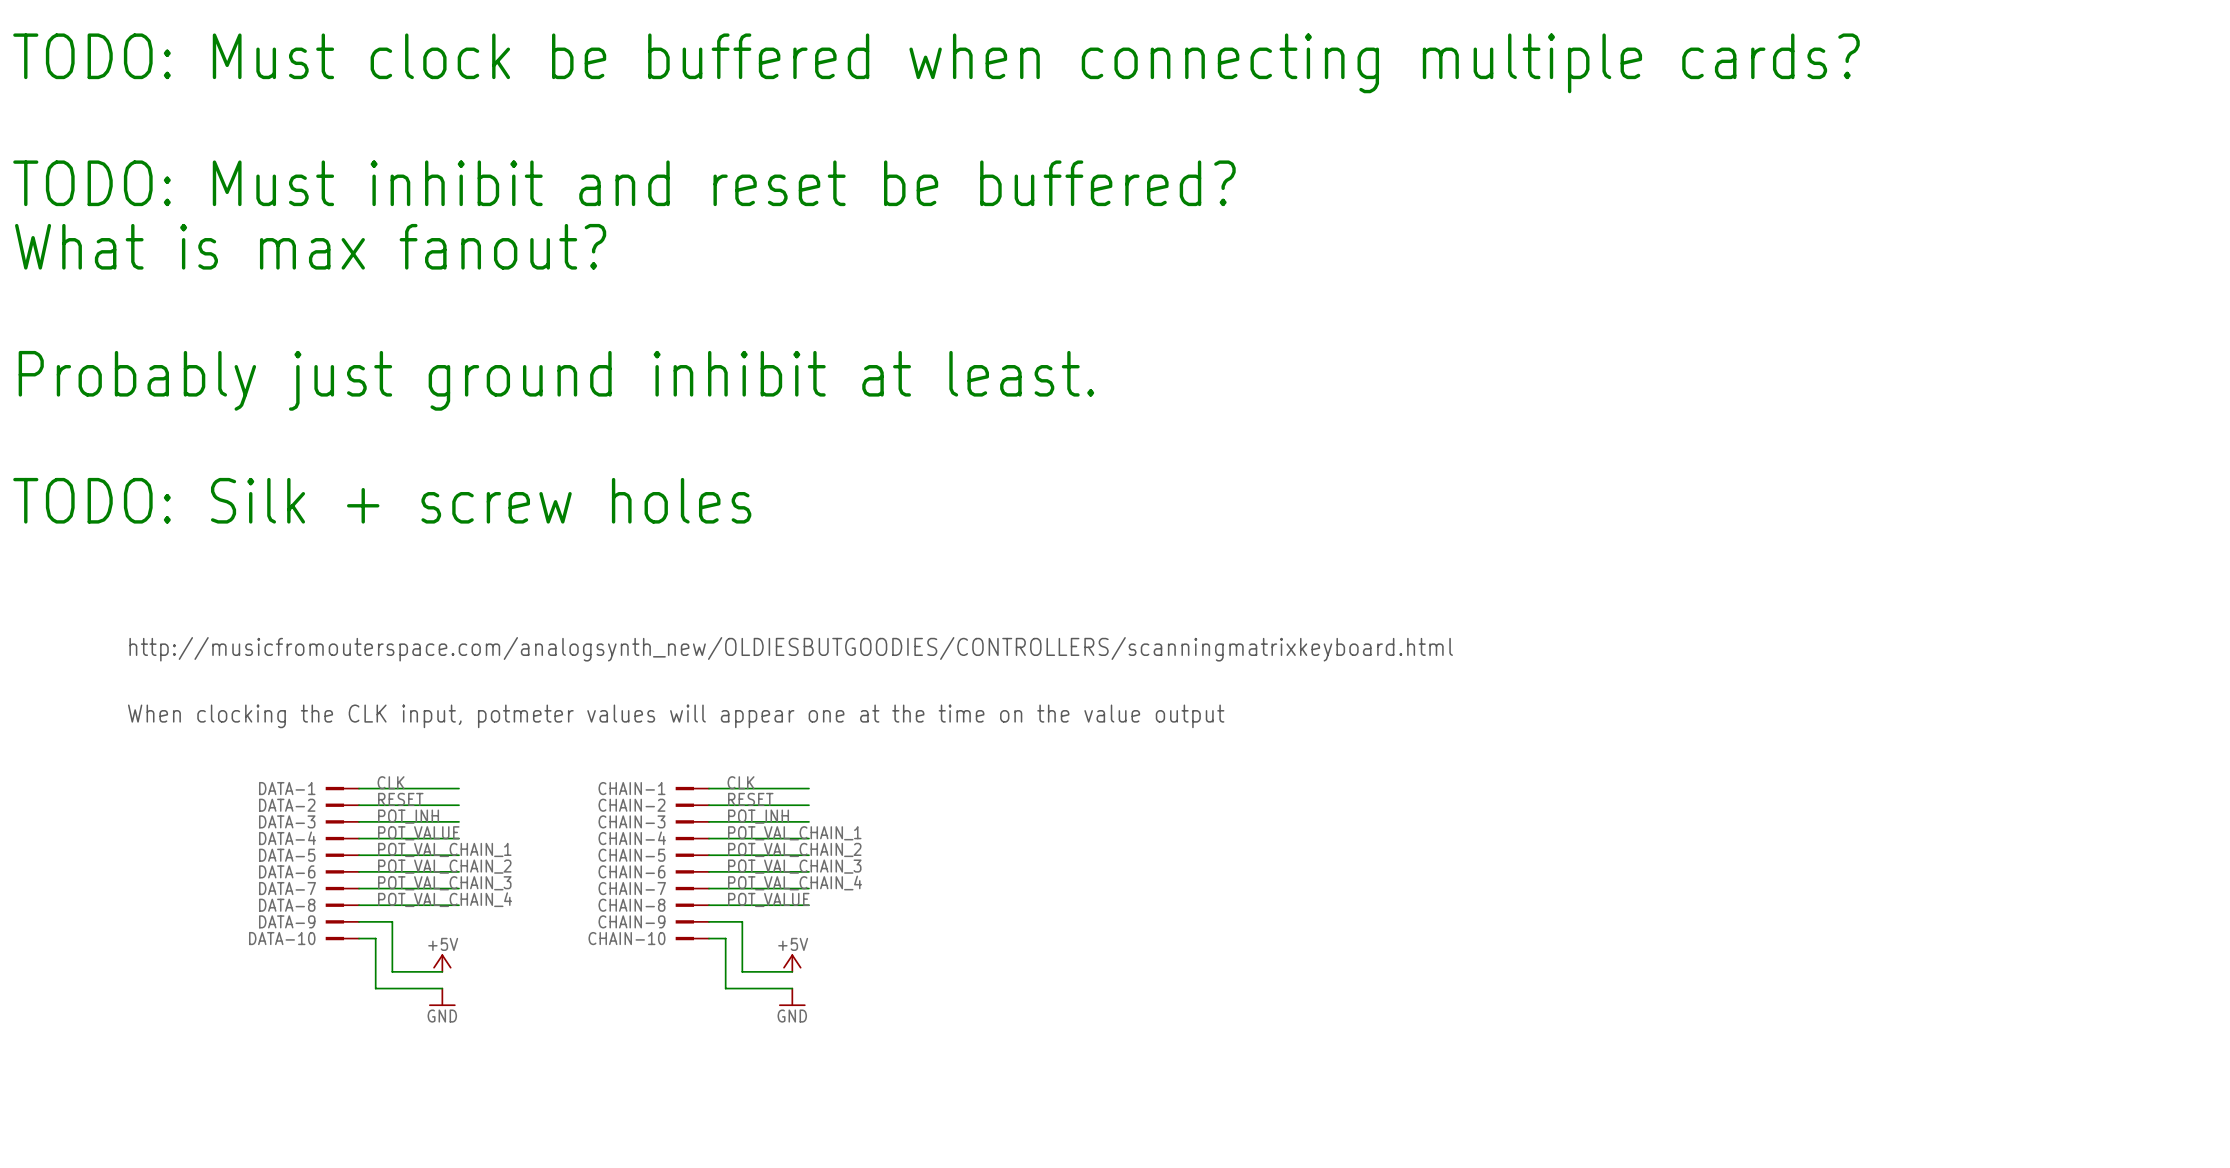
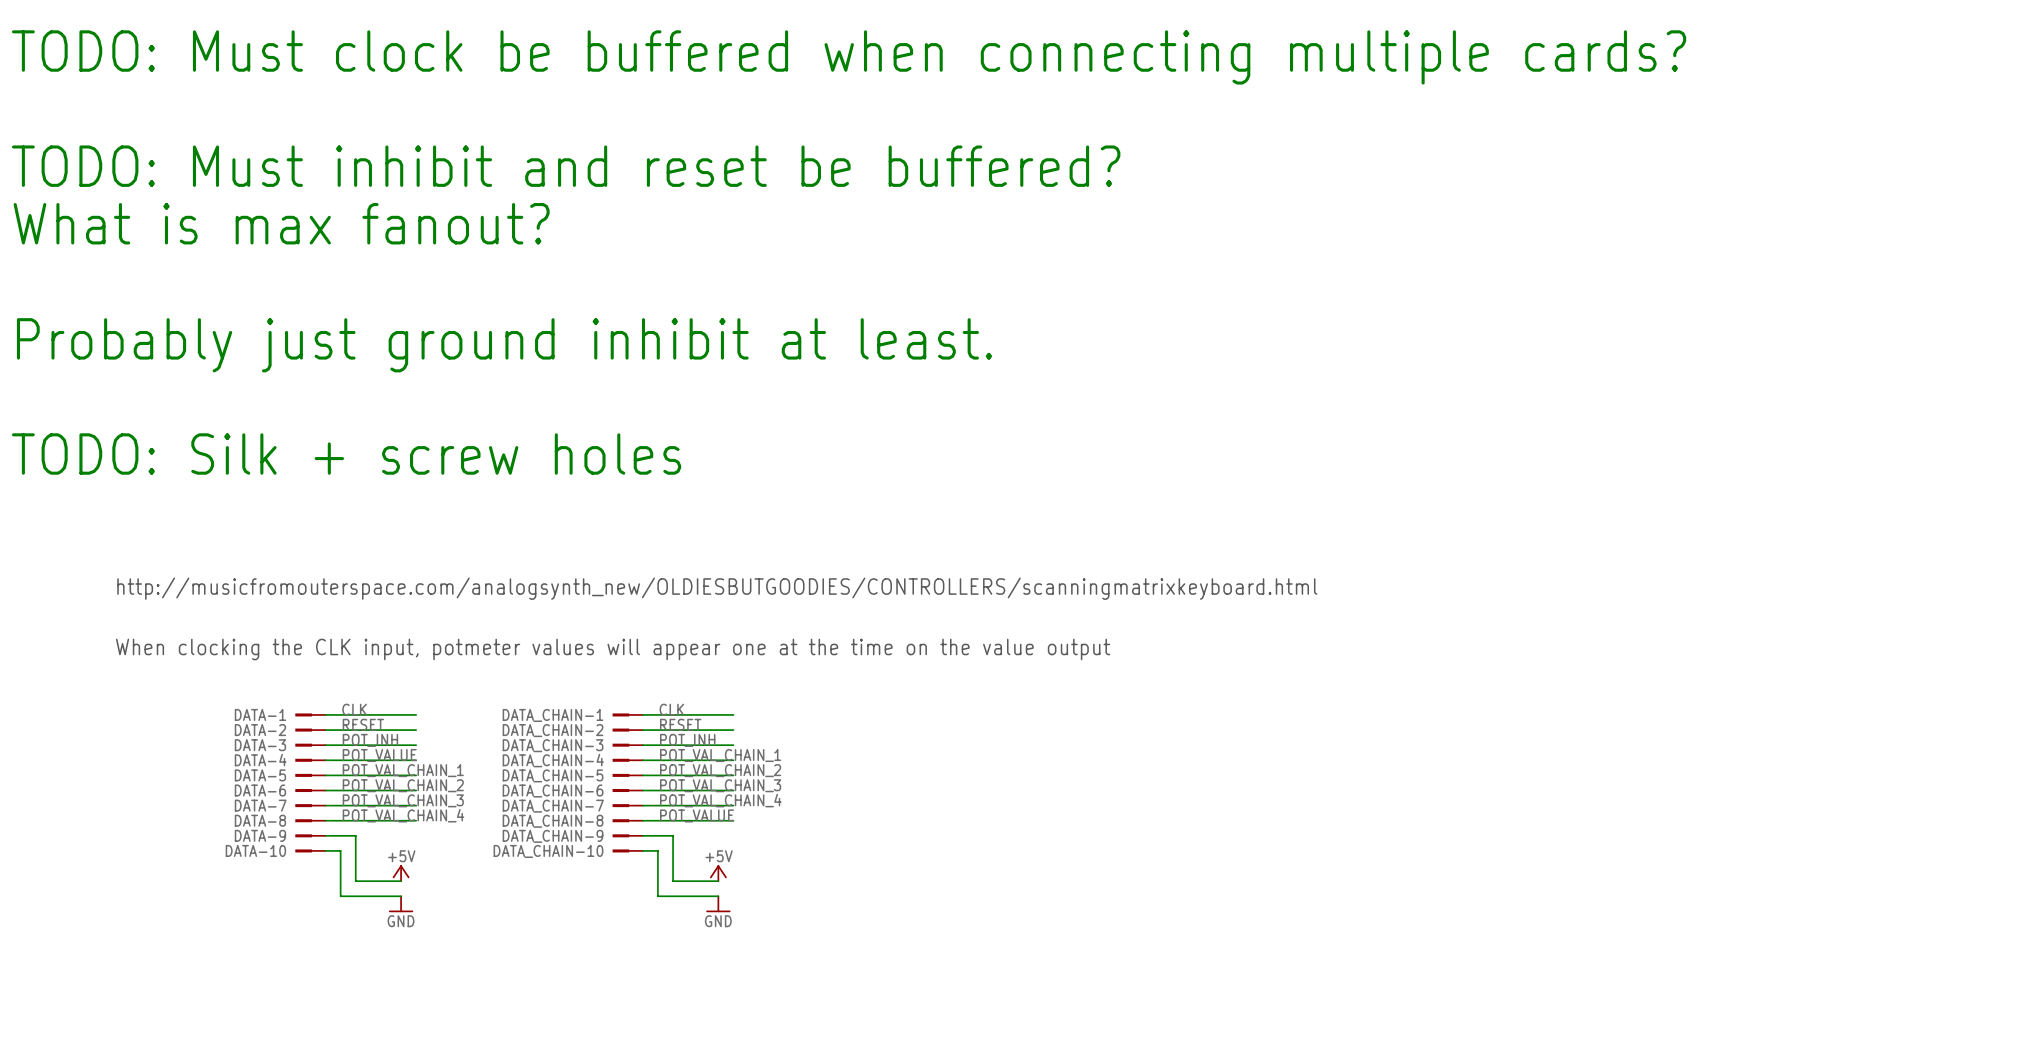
CHAIN-1 name: CHAIN-1 (631, 788) -> DATA_CHAIN-1 (553, 715)
CHAIN-2 name: CHAIN-2 (631, 805) -> DATA_CHAIN-2 (553, 730)
CHAIN-3 name: CHAIN-3 (631, 821) -> DATA_CHAIN-3 (553, 745)
CHAIN-4 name: CHAIN-4 (632, 838) -> DATA_CHAIN-4 (553, 760)
CHAIN-5 name: CHAIN-5 (631, 855) -> DATA_CHAIN-5 (553, 775)
CHAIN-6 name: CHAIN-6 (631, 871) -> DATA_CHAIN-6 (553, 791)
CHAIN-7 name: CHAIN-7 (632, 888) -> DATA_CHAIN-7 (553, 806)
CHAIN-8 name: CHAIN-8 (631, 905) -> DATA_CHAIN-8 (553, 821)
CHAIN-9 name: CHAIN-9 (631, 921) -> DATA_CHAIN-9 (553, 836)
CHAIN-10 name: CHAIN-10 (626, 938) -> DATA_CHAIN-10 (548, 851)

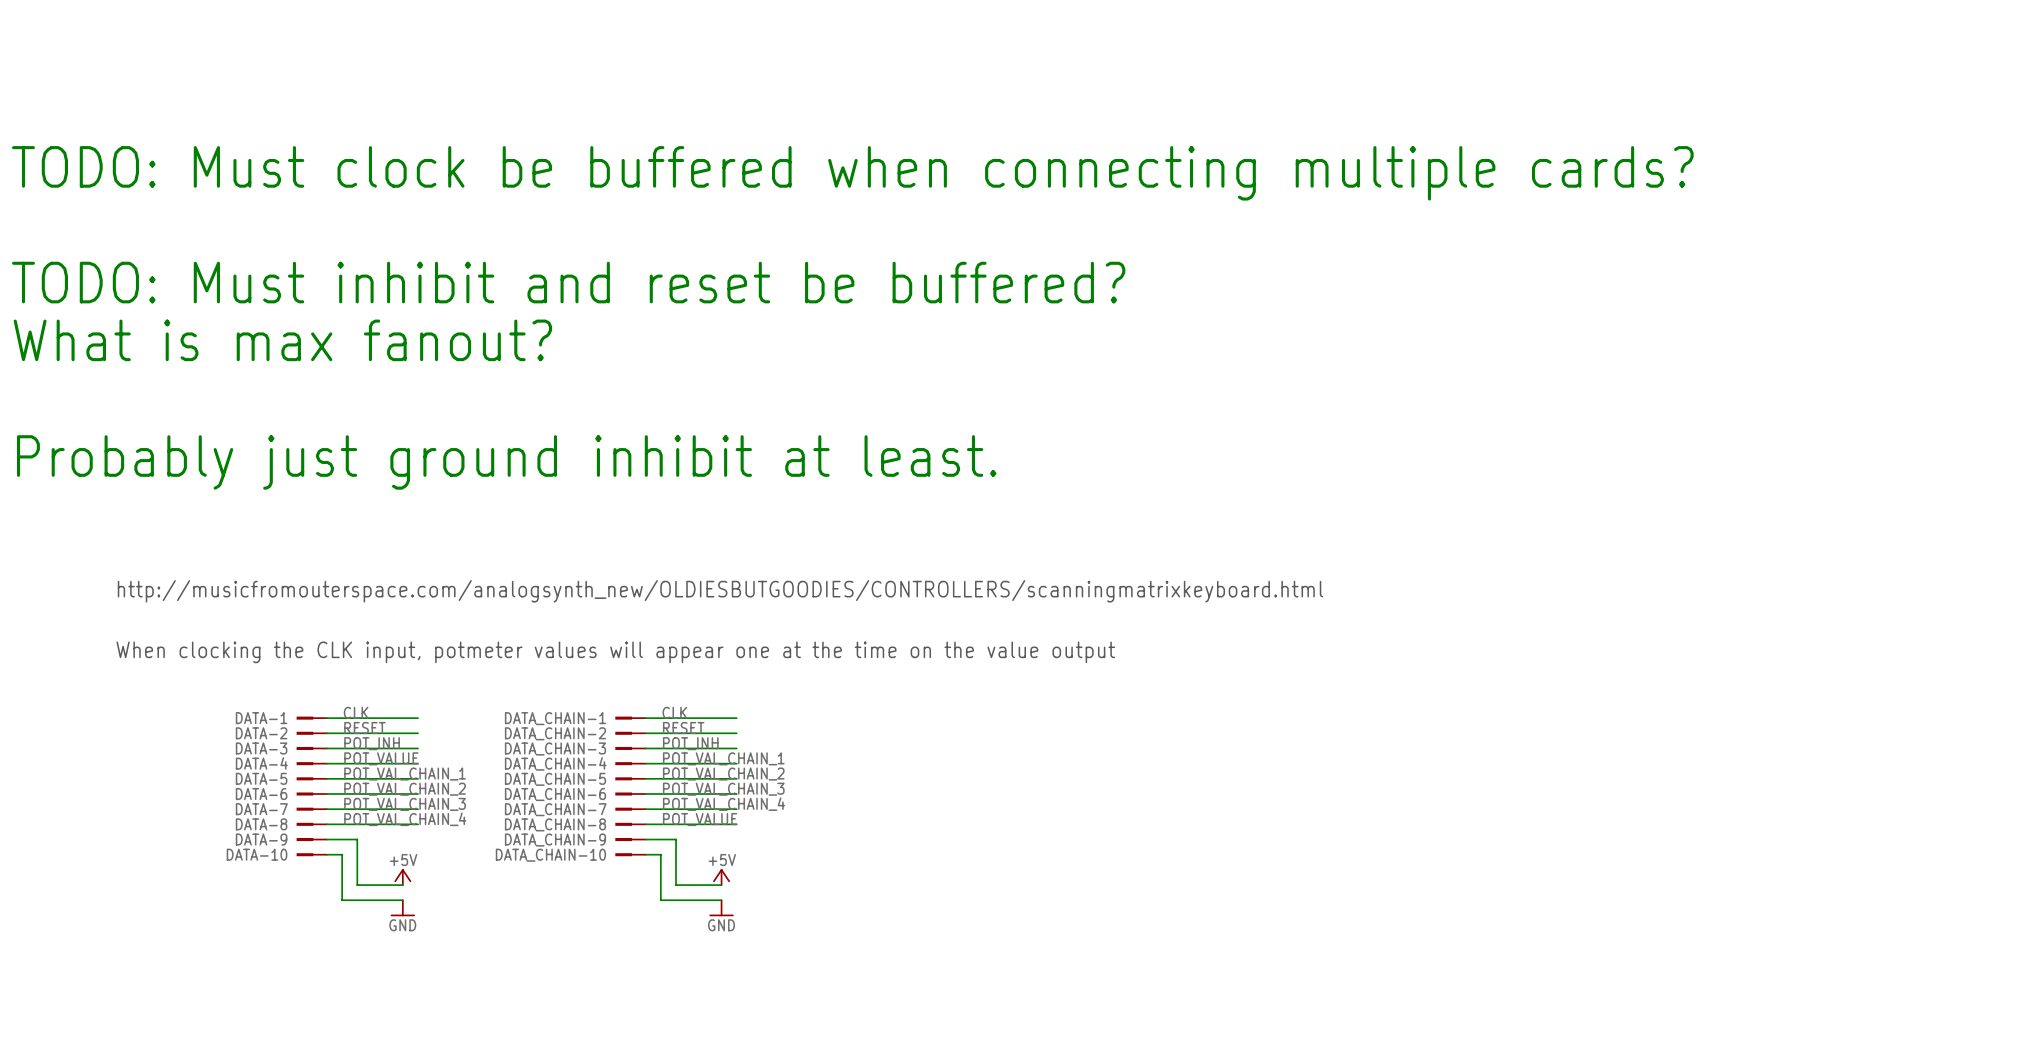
text: TODO: Must clock be buffered when connecting multiple cards? (849, 57) -> none
text: TODO: Must inhibit and reset be buffered? (566, 166) -> TODO: Must clock be buffered when connecting multiple cards? (852, 173)
text: What is max fanout? (281, 223) -> none
text: none -> TODO: Must inhibit and reset be buffered? (568, 282)
text: Probably just ground inhibit at least. (504, 345) -> What is max fanout? (282, 340)
text: TODO: Silk + screw holes (346, 454) -> Probably just ground inhibit at least. (506, 462)

